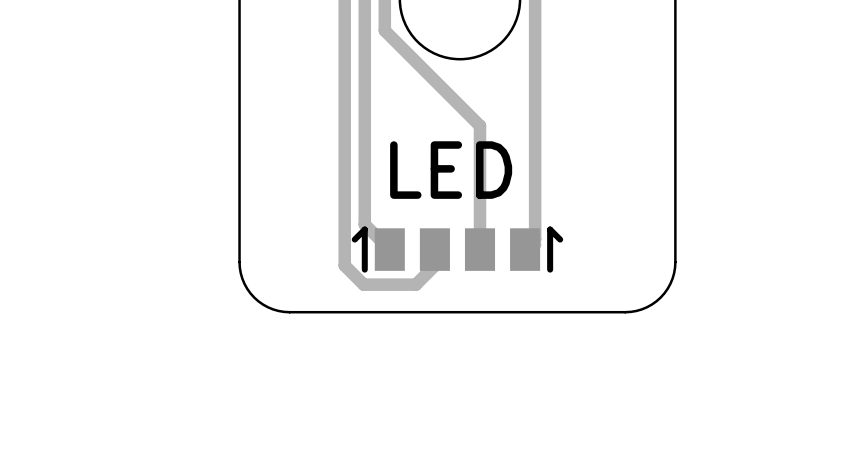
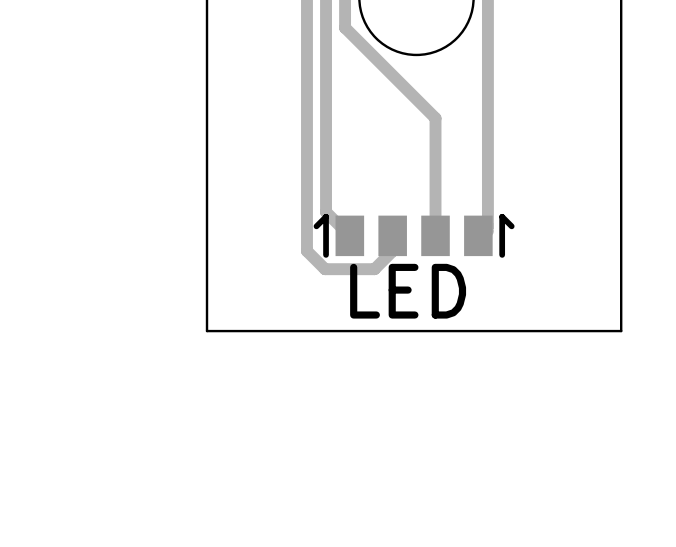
part value position: LED (451, 170) -> LED (408, 291)
board edge: (239, 262) (244, 283) (254, 297) (273, 309) (289, 312) (630, 311) (647, 307) (660, 297) (672, 278) (675, 262) -> (207, 247) (207, 331) (621, 331) (621, 247)

